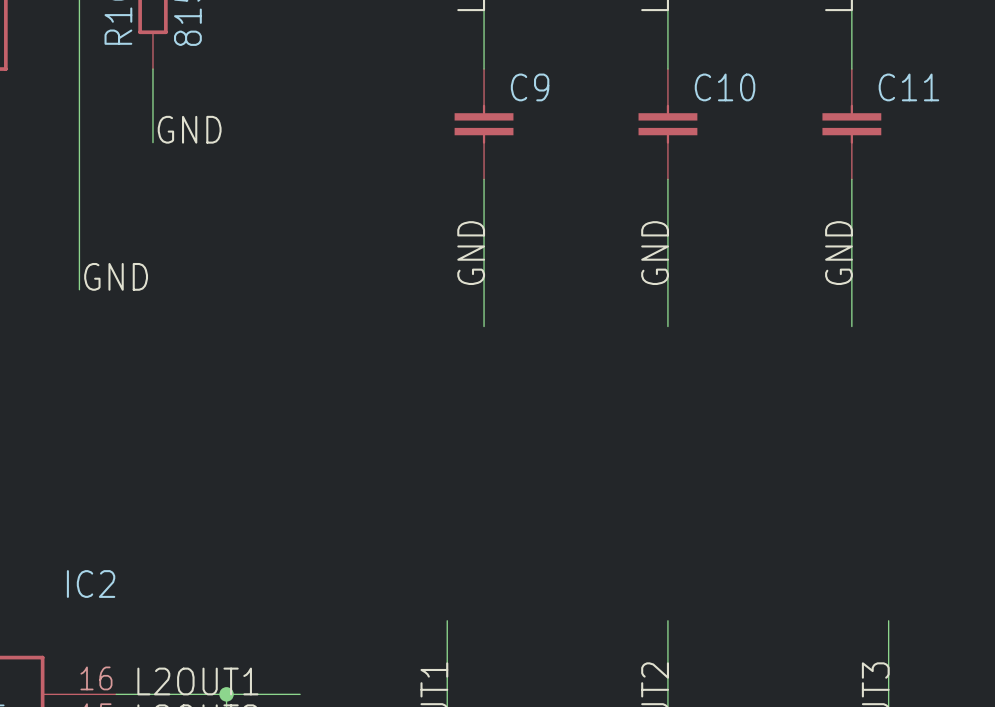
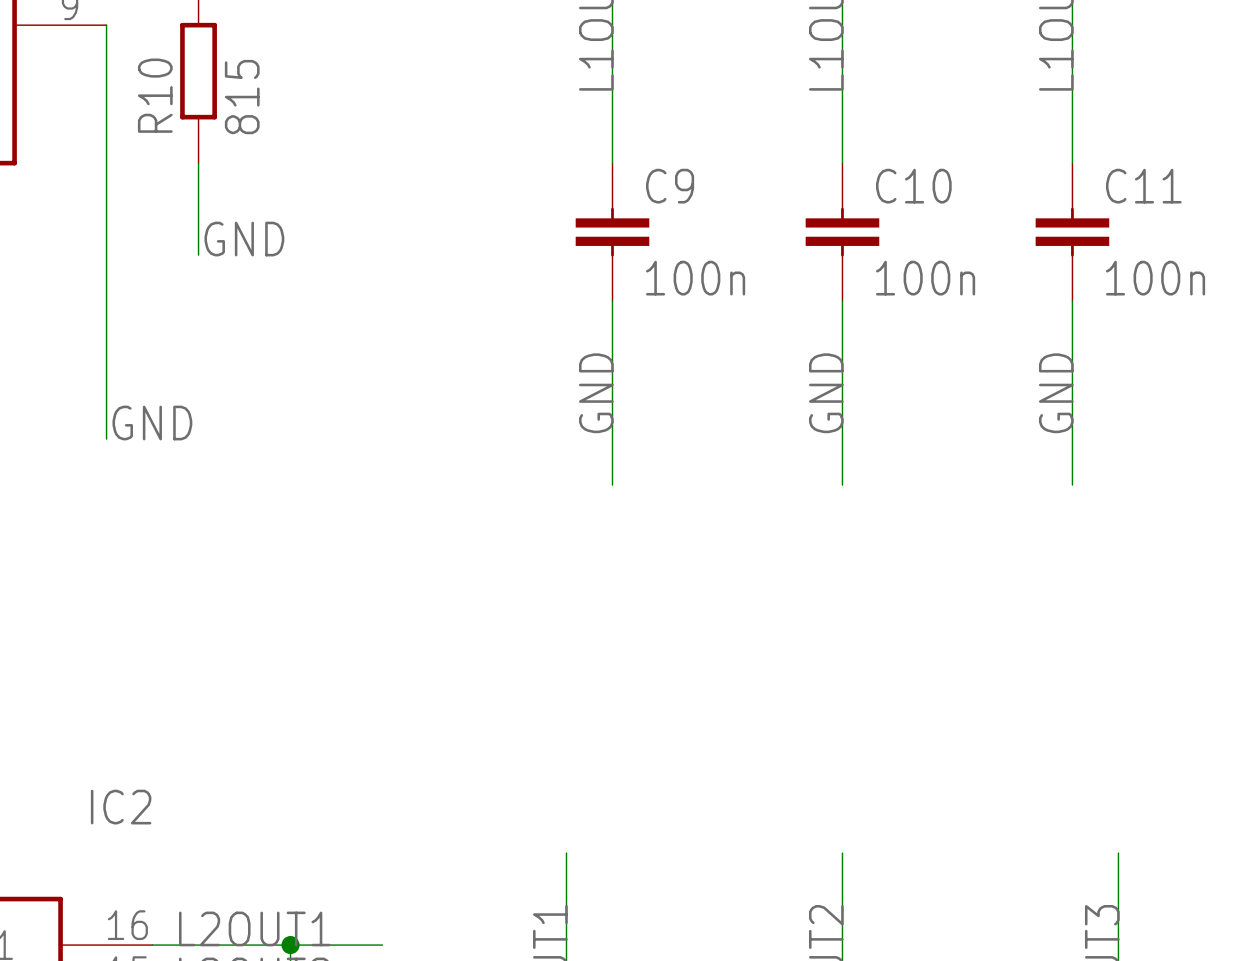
C9 value: none -> 100n (695, 278)
C10 value: none -> 100n (925, 278)
C11 value: none -> 100n (1155, 278)

